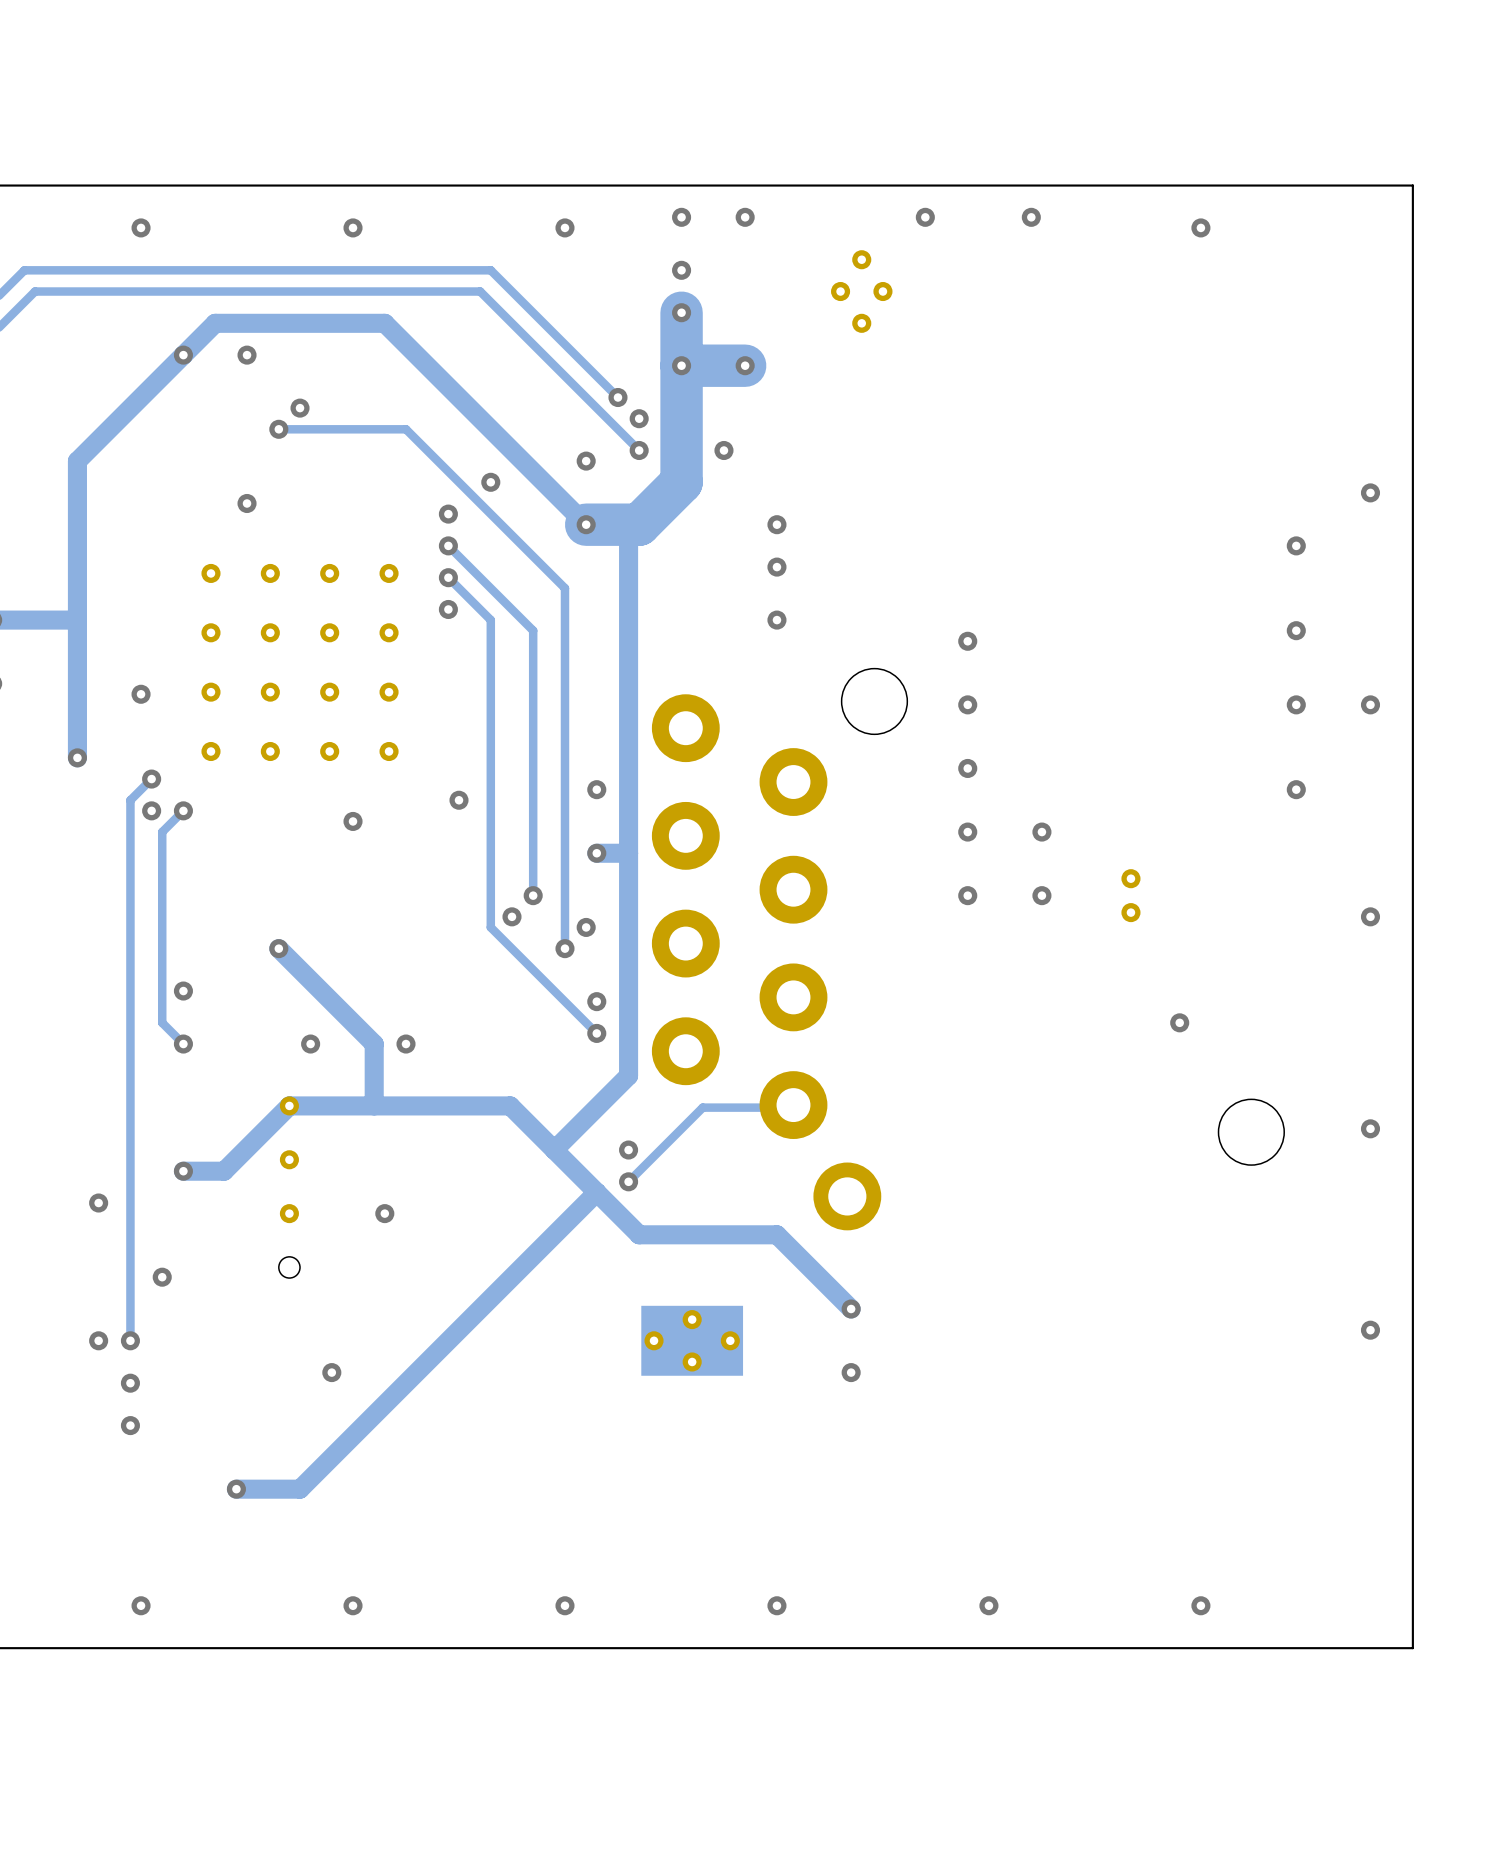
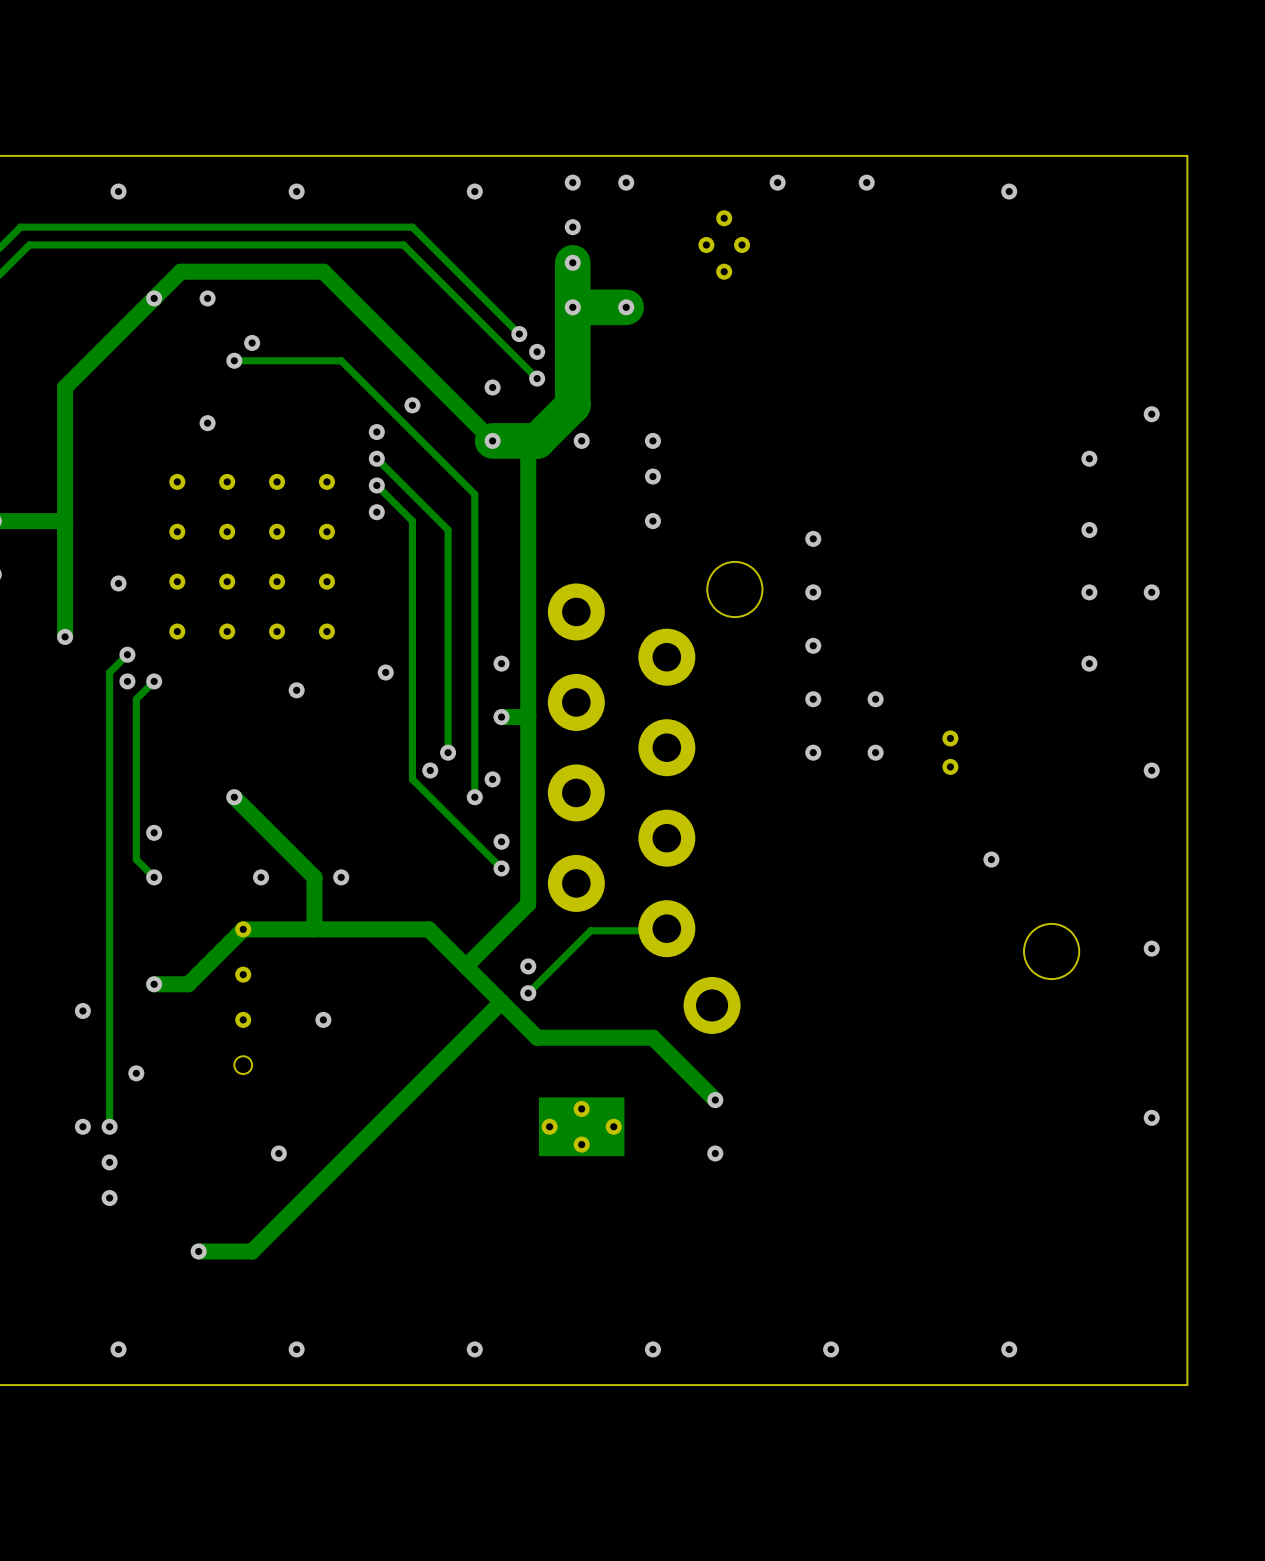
via position: (723, 450) -> (581, 440)

